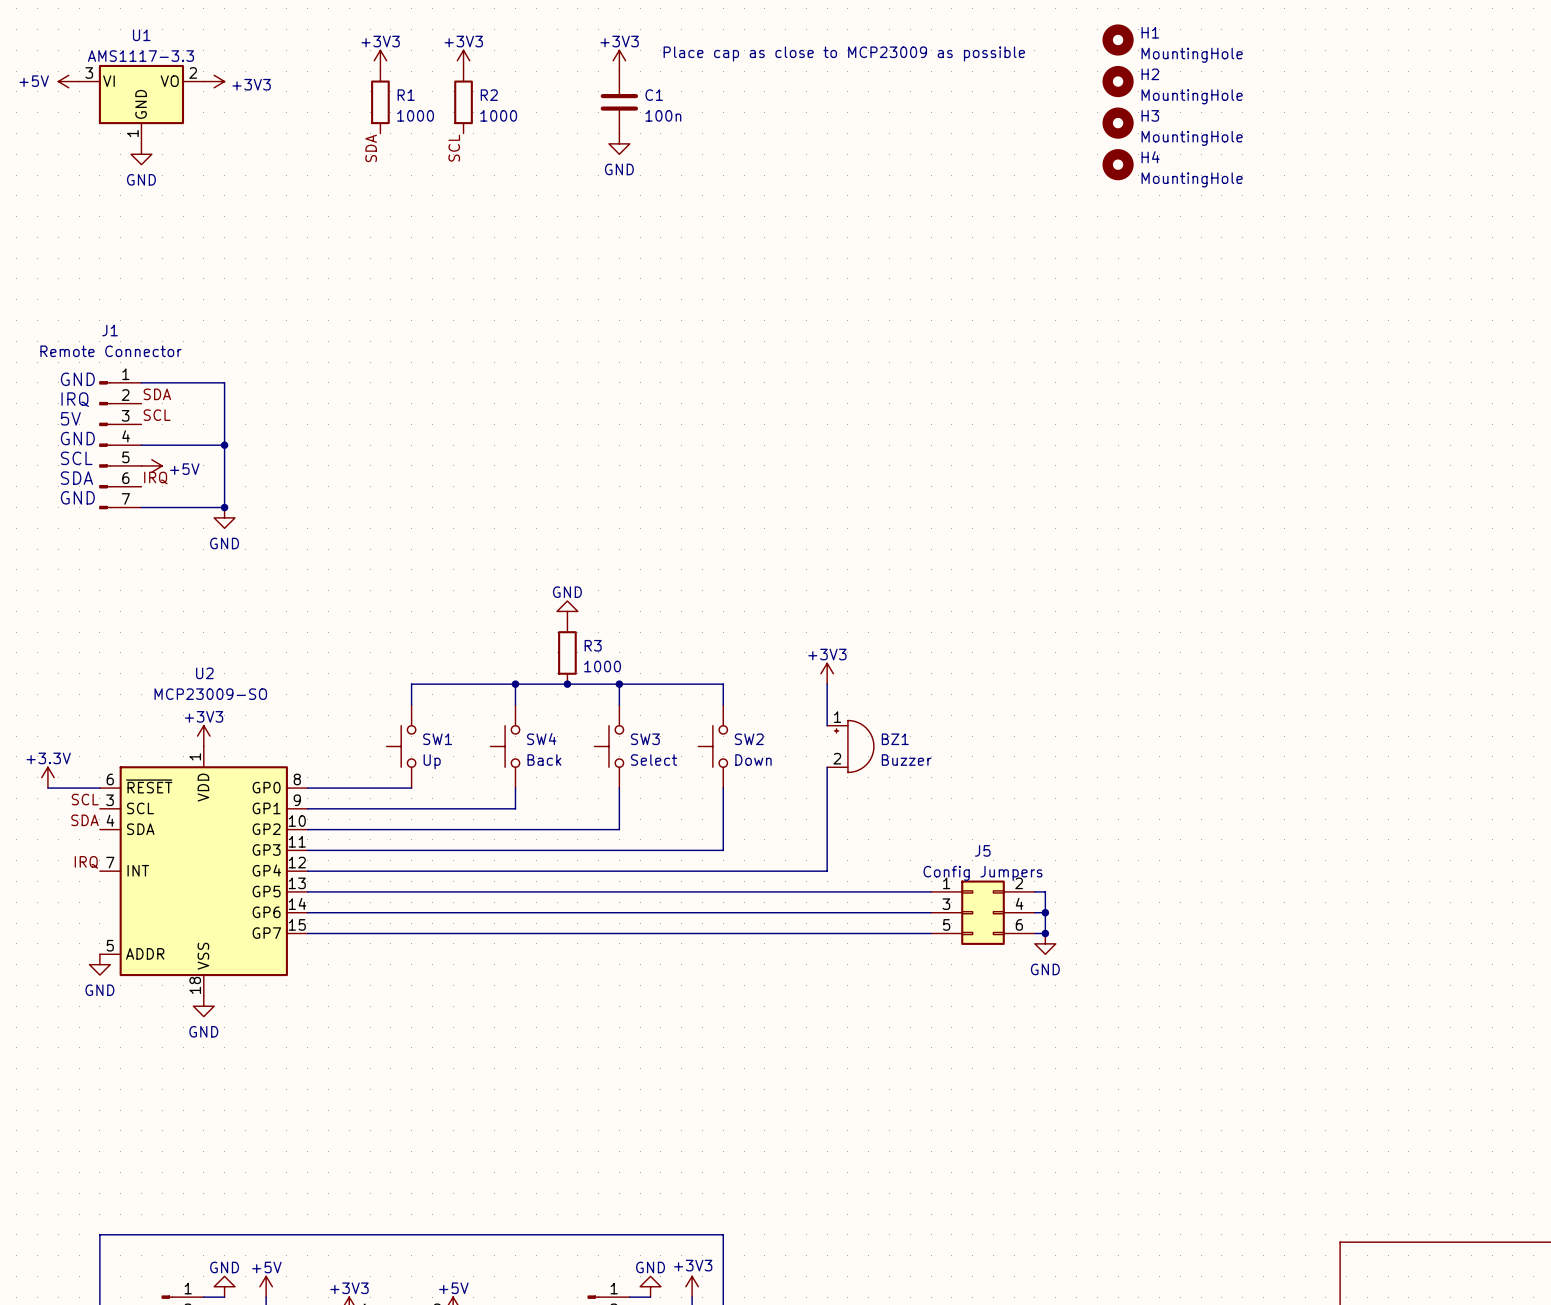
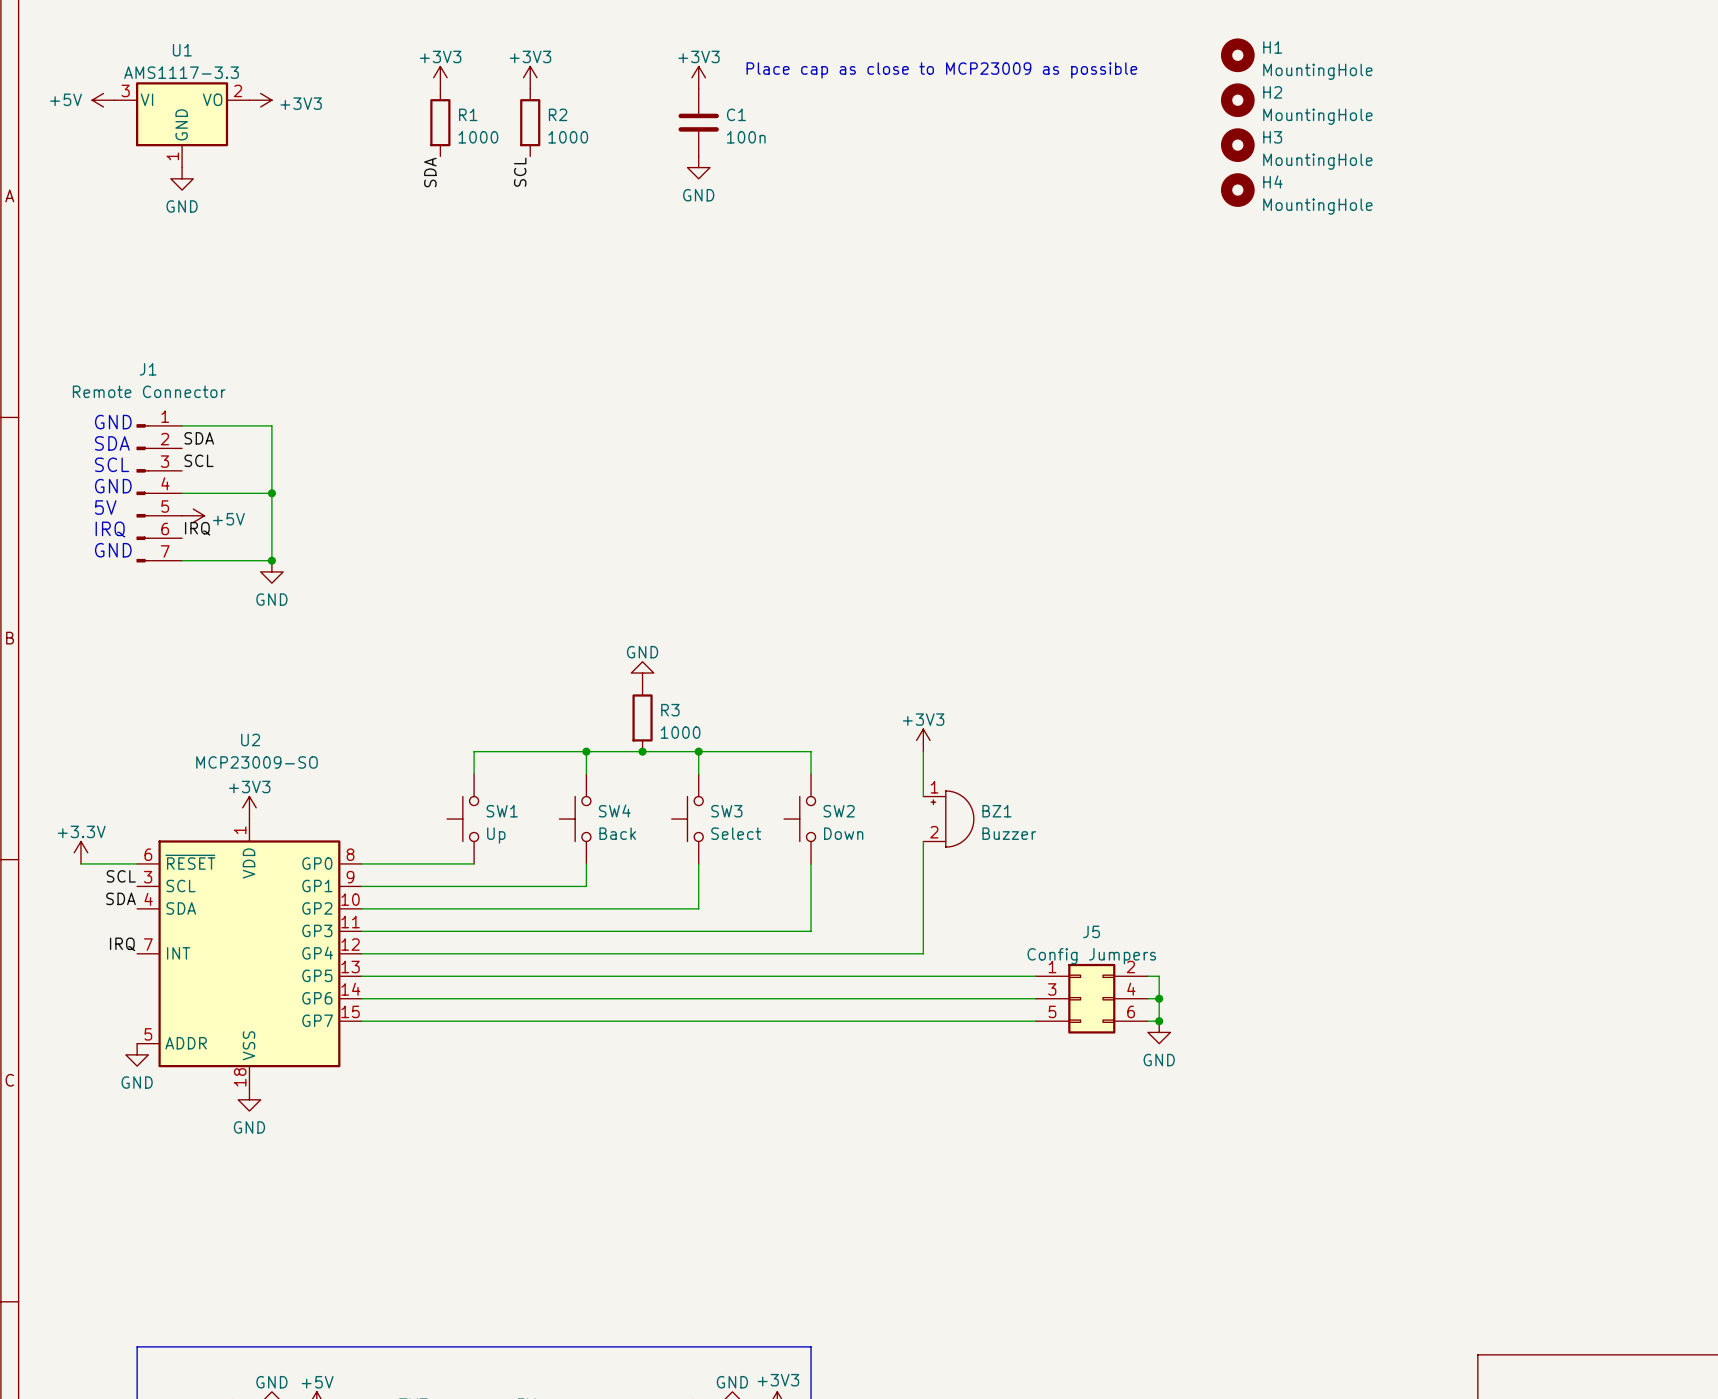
text: IRQ (75, 399) -> SDA (112, 443)
text: 5V (70, 418) -> SCL (112, 464)
text: SCL (76, 458) -> 5V (105, 507)
text: SDA (76, 478) -> IRQ (110, 529)

